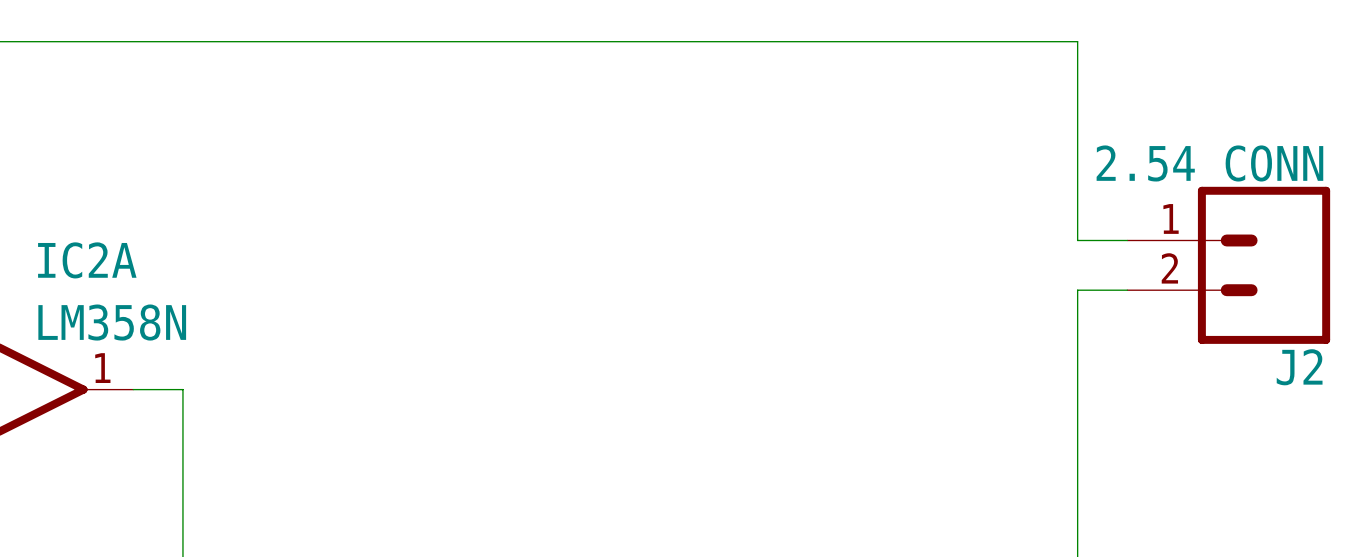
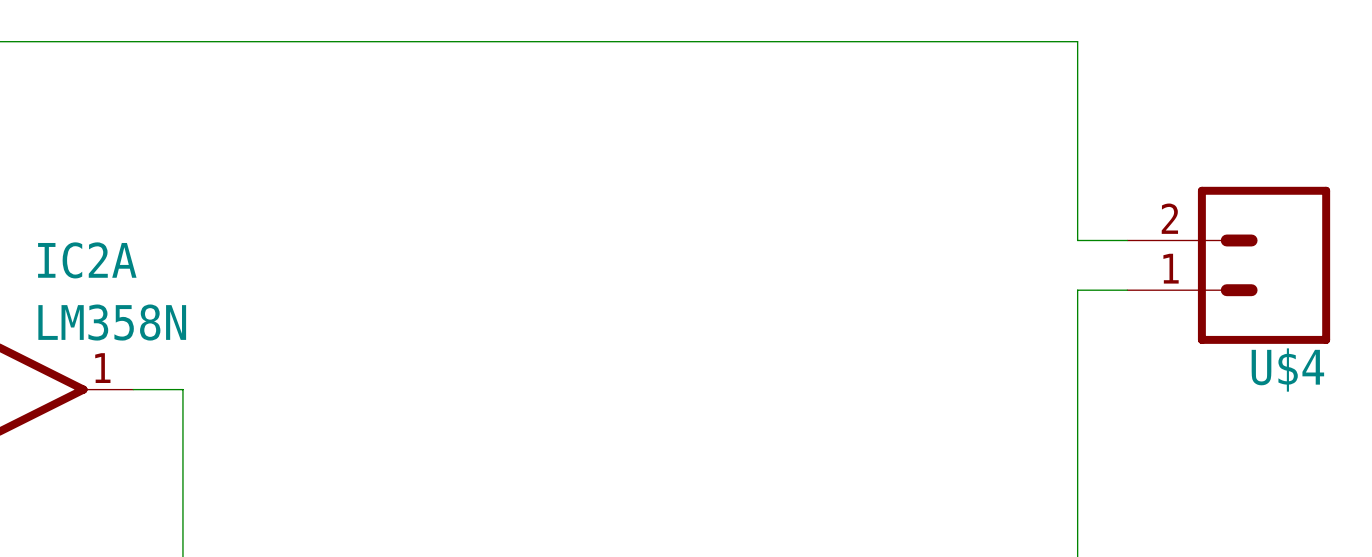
J2 value: 2.54 CONN (1209, 163) -> none
J2 flip: as is (1264, 265) -> up-down (1264, 265)
J2 name: J2 (1299, 367) -> U$4 (1287, 370)

